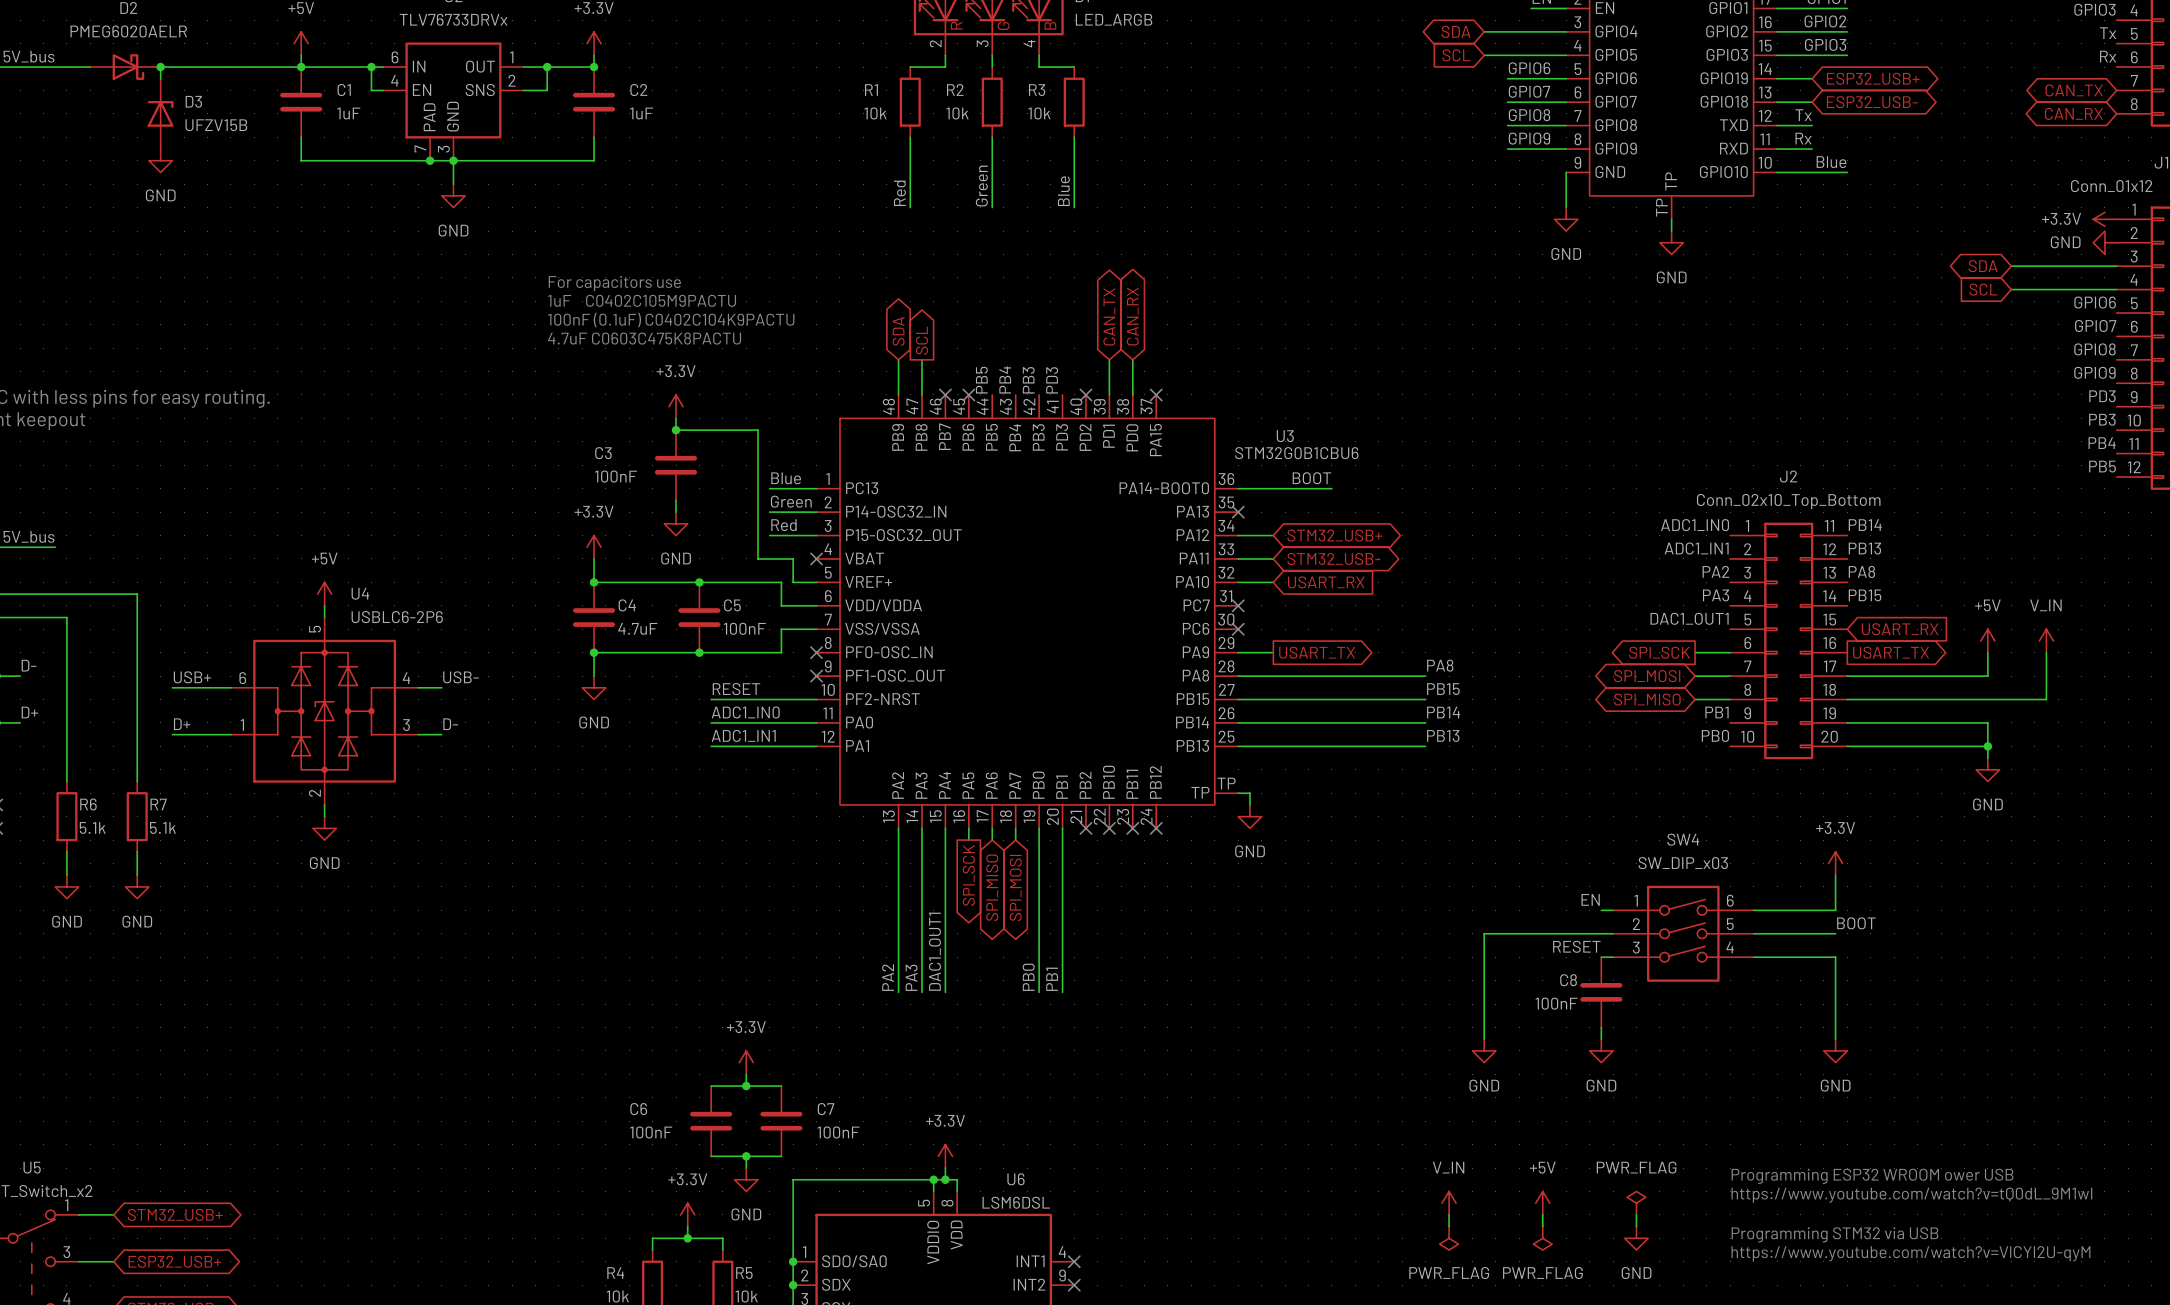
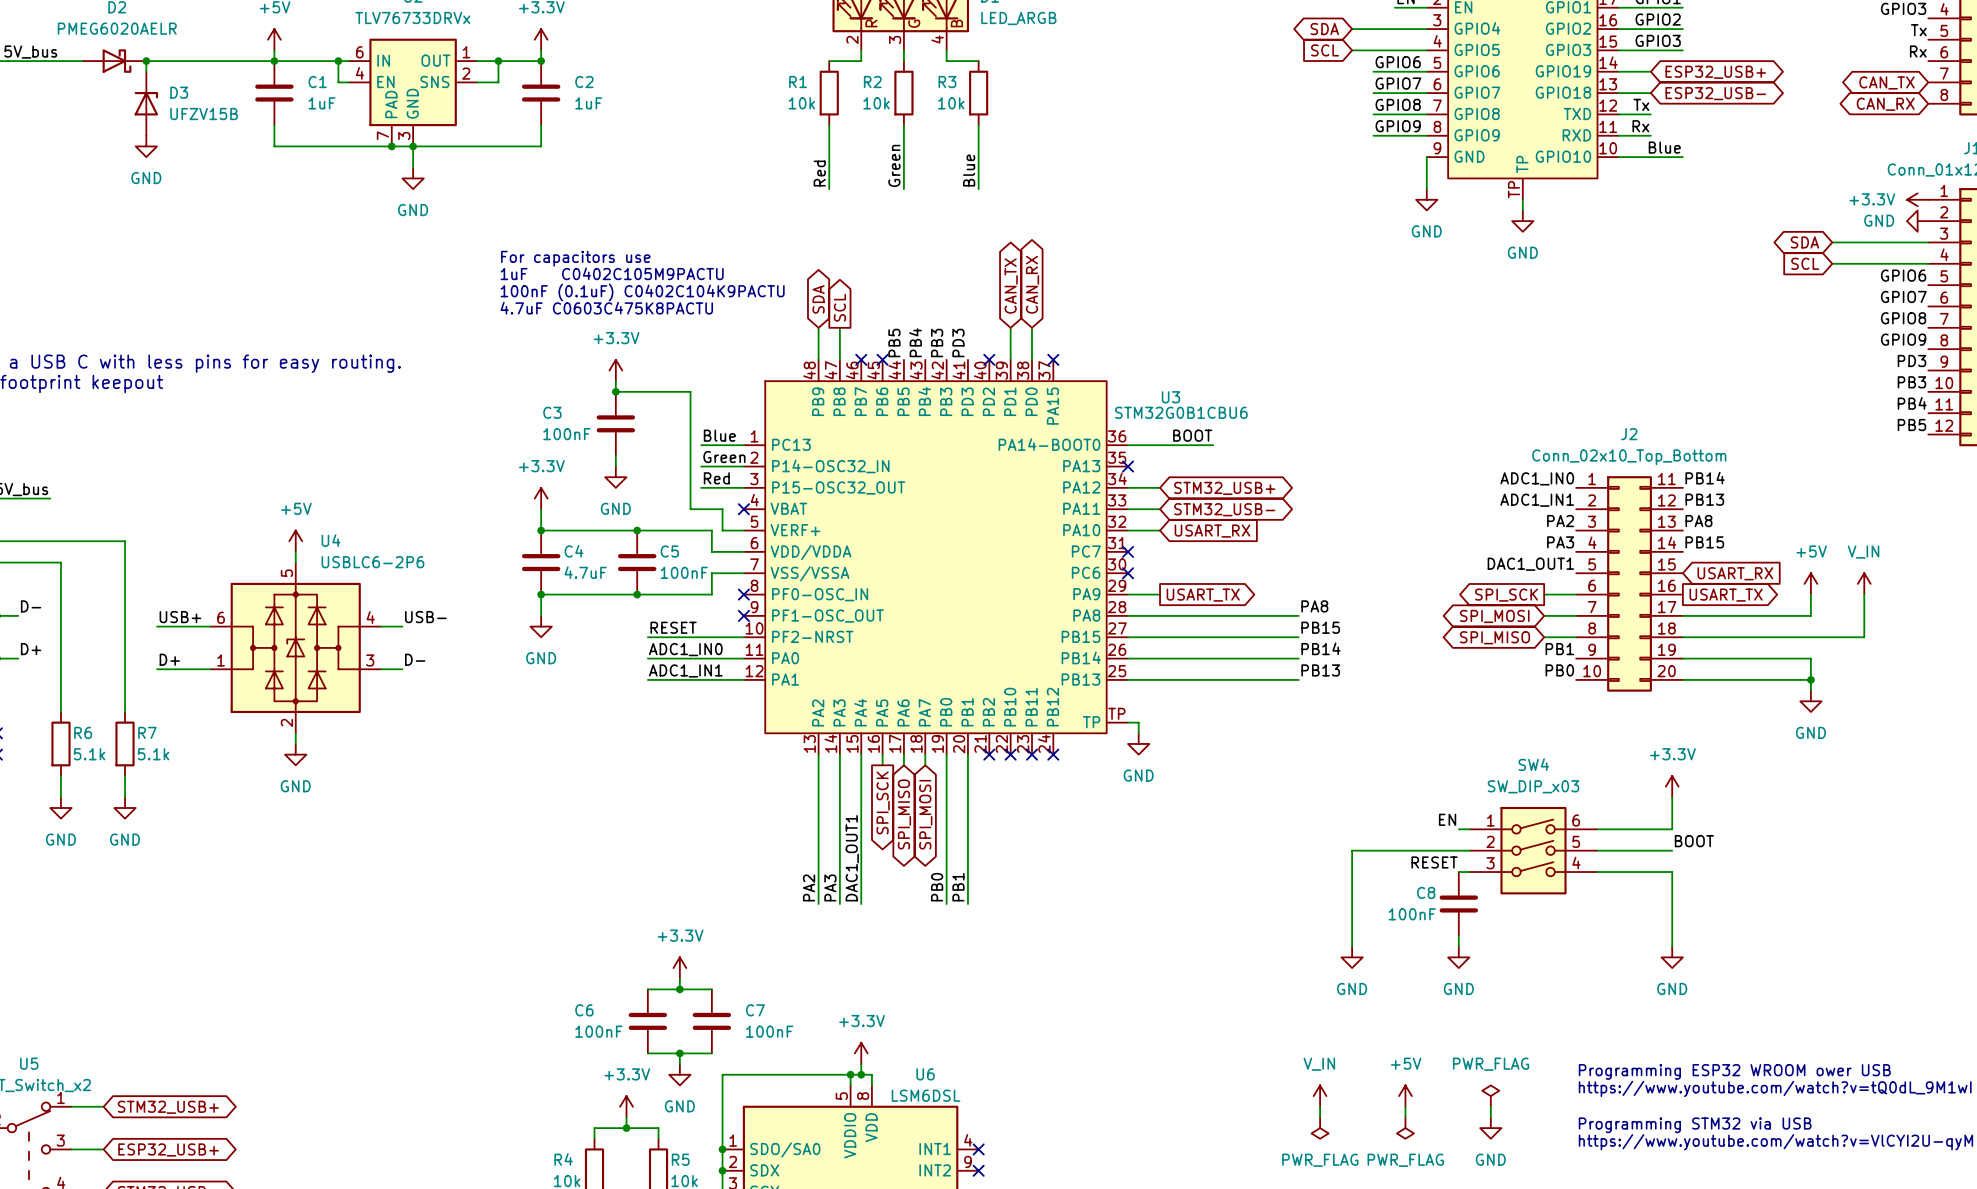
U3 pin name: VREF+ (868, 581) -> VERF+ (795, 530)

